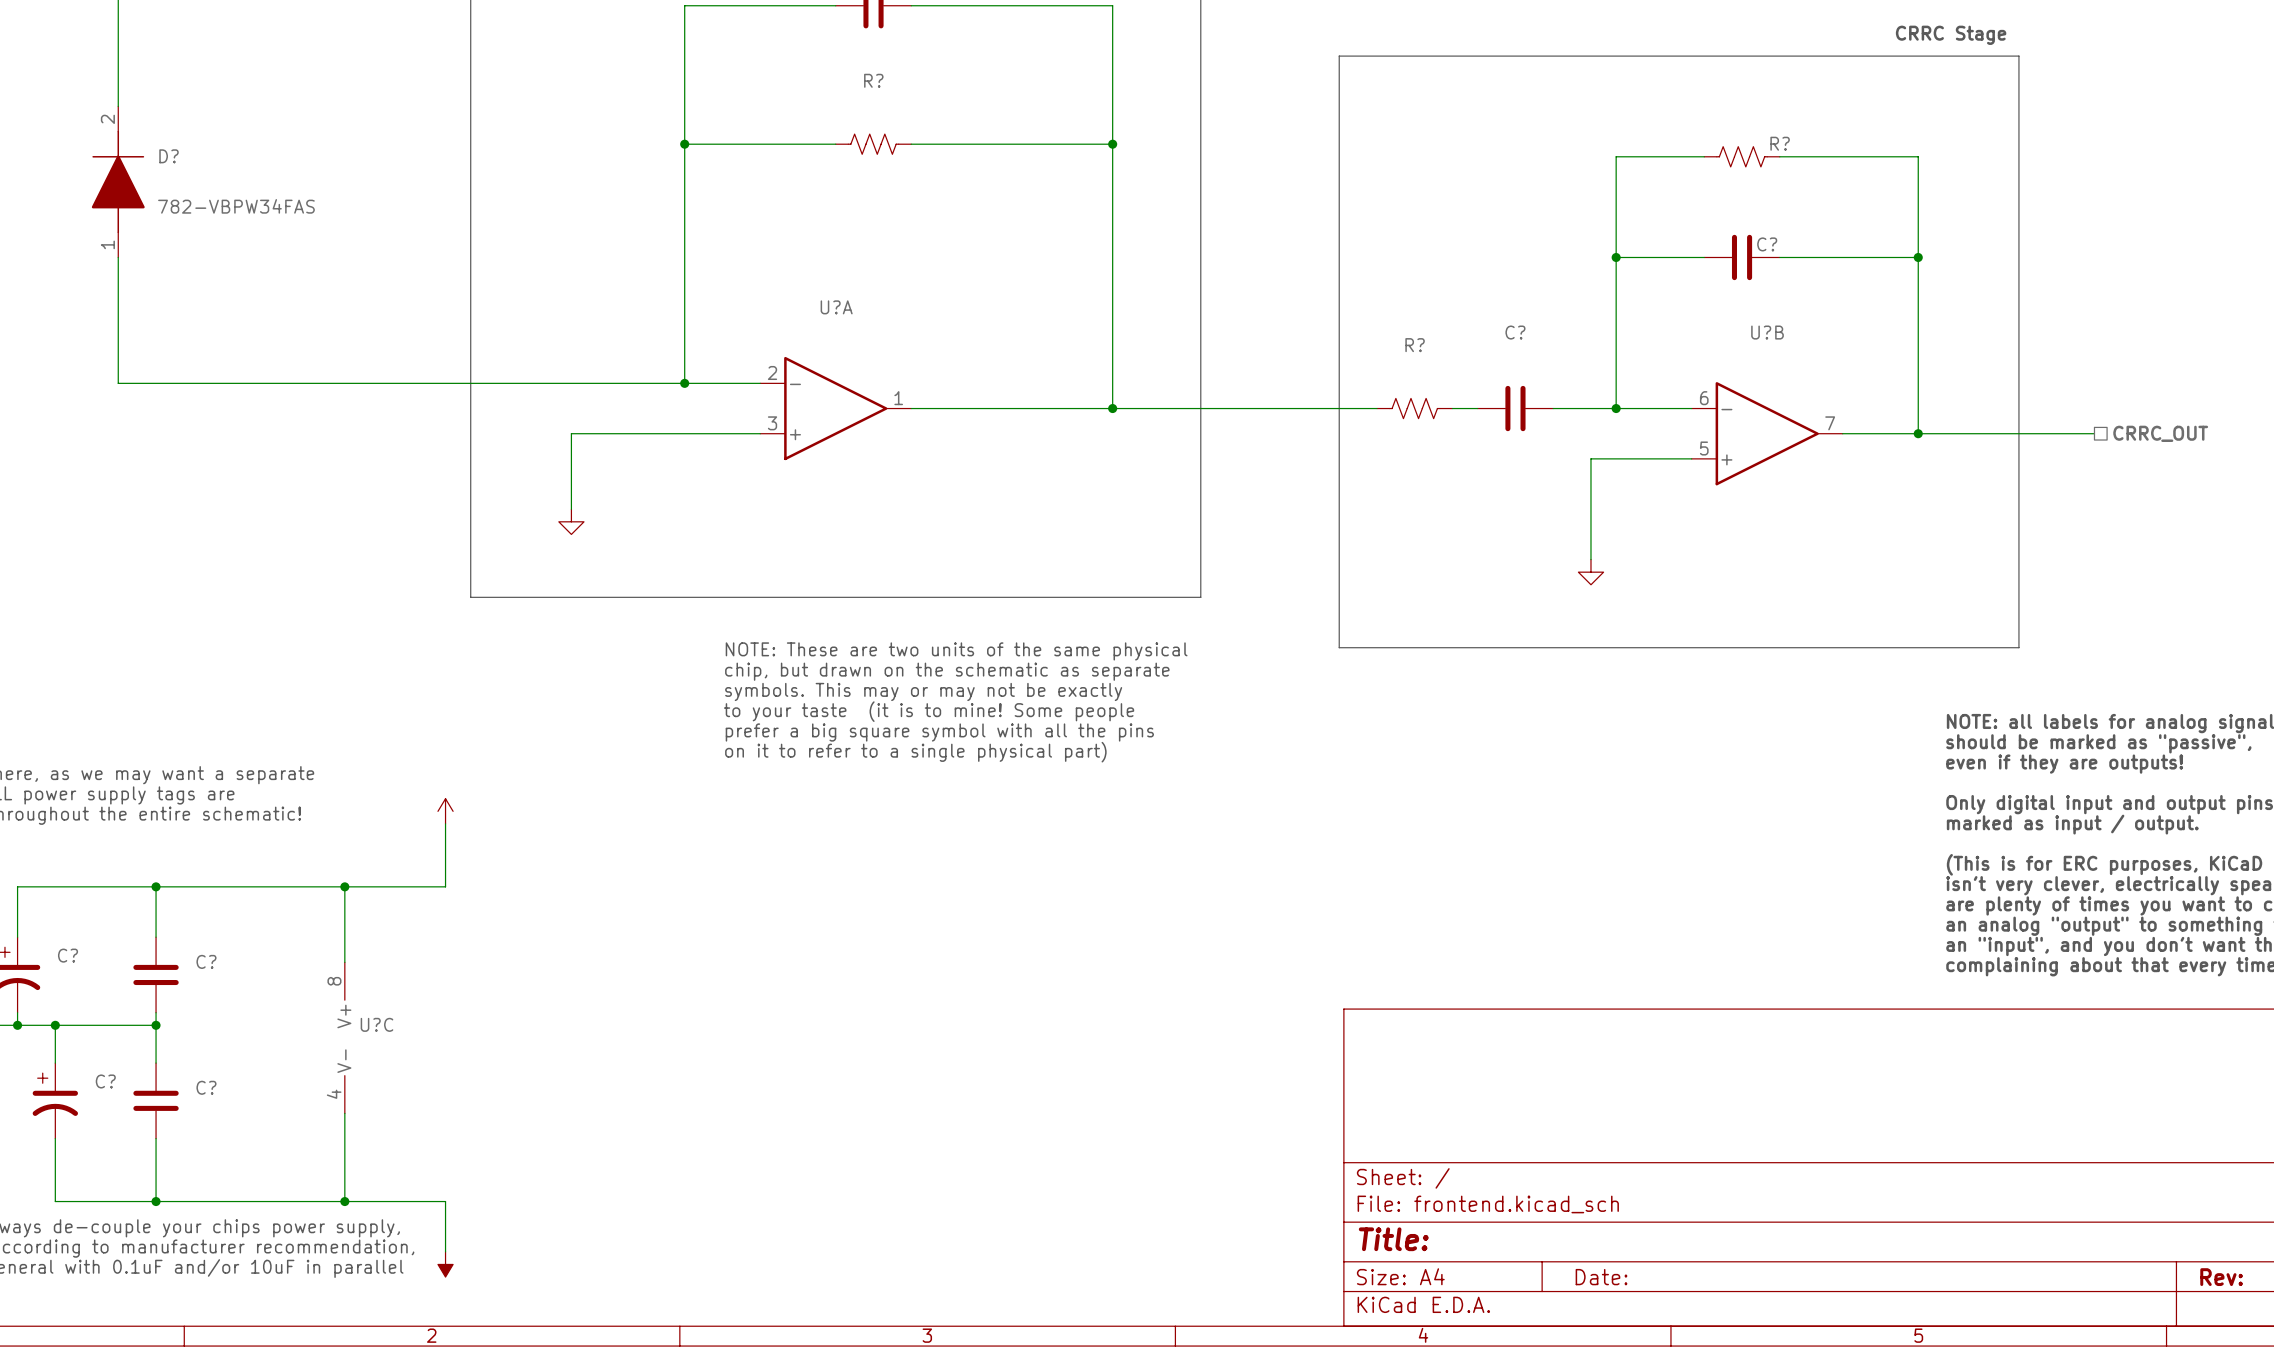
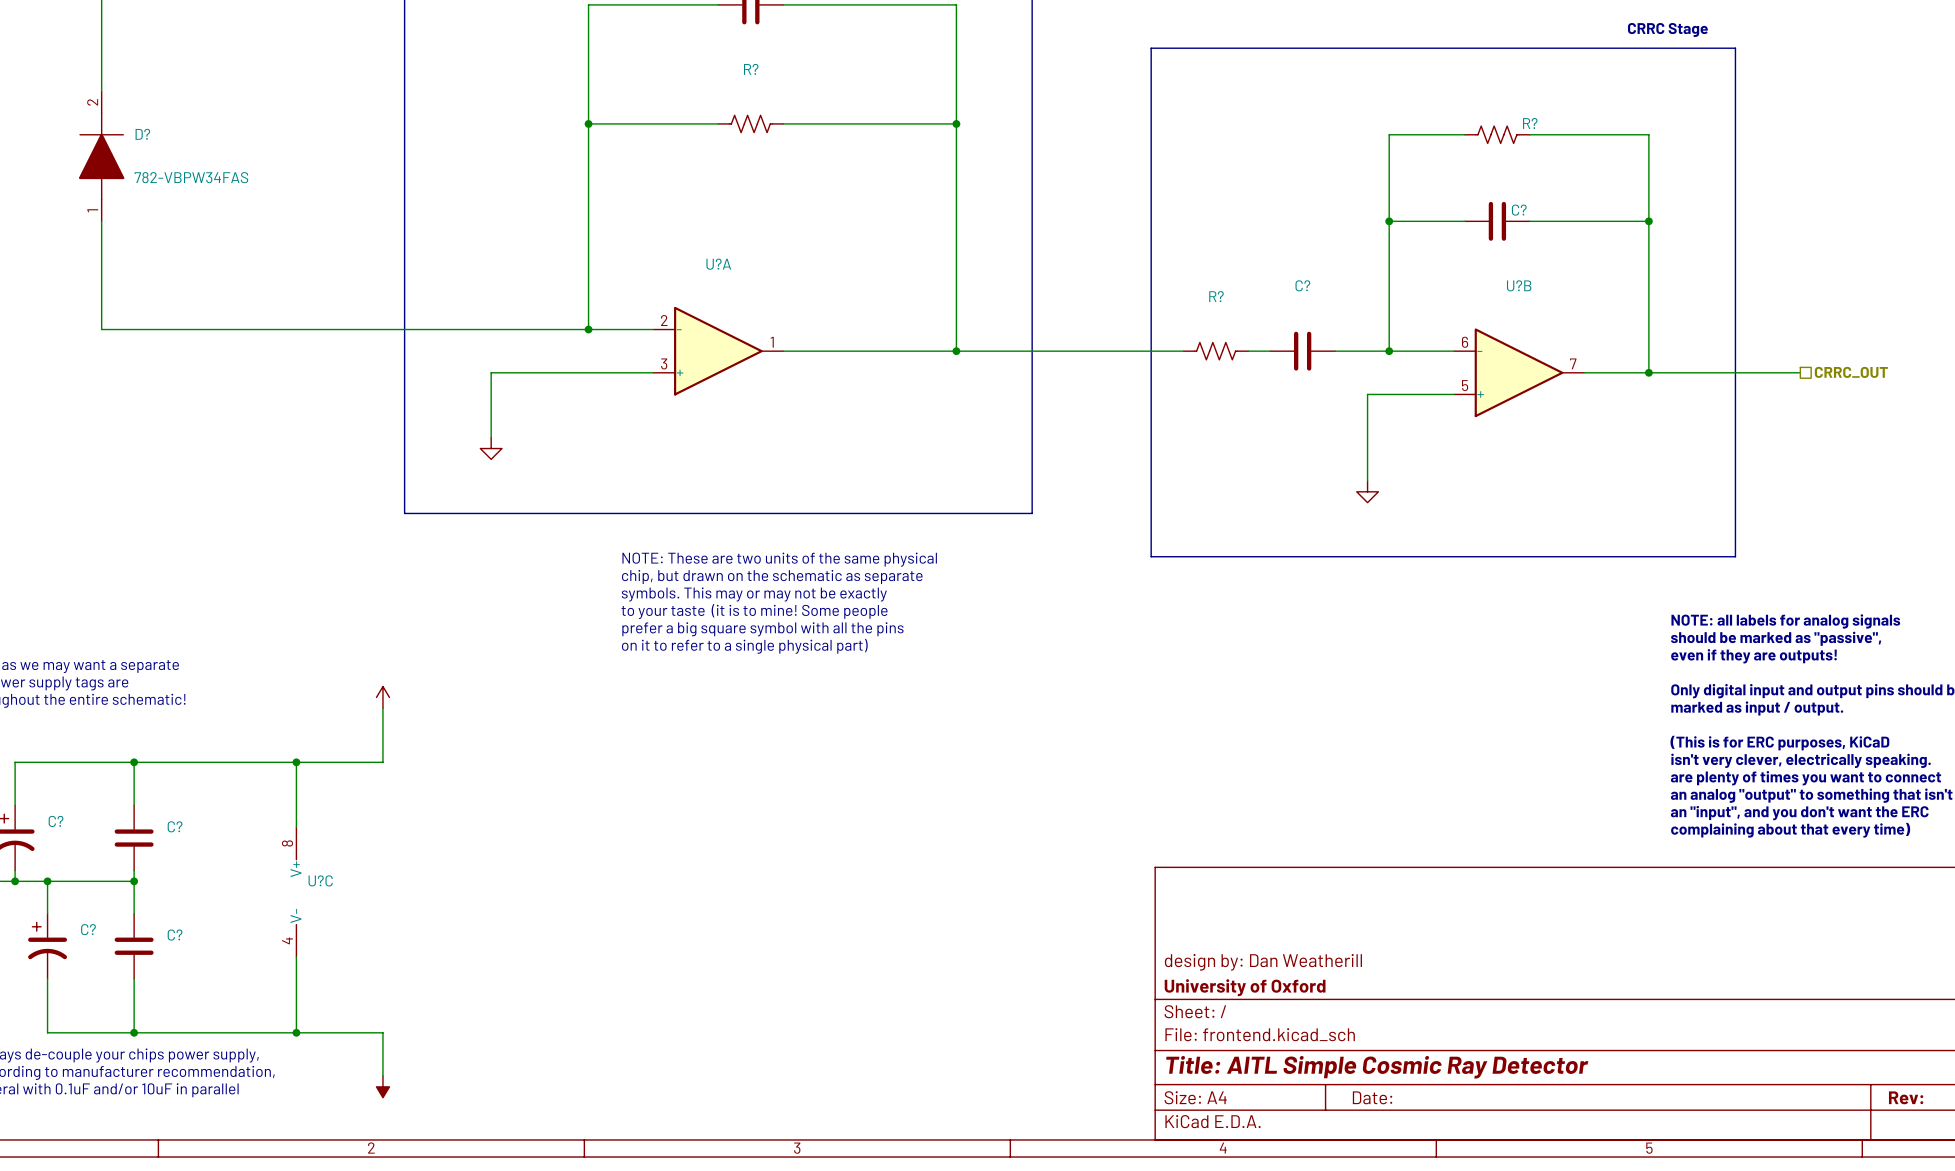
title block: none -> design by: Dan Weatherill (1263, 962)
title block: none -> University of Oxford (1245, 987)
title block: Title: (1393, 1239) -> Title: AITL Simple Cosmic Ray Detector (1377, 1067)

